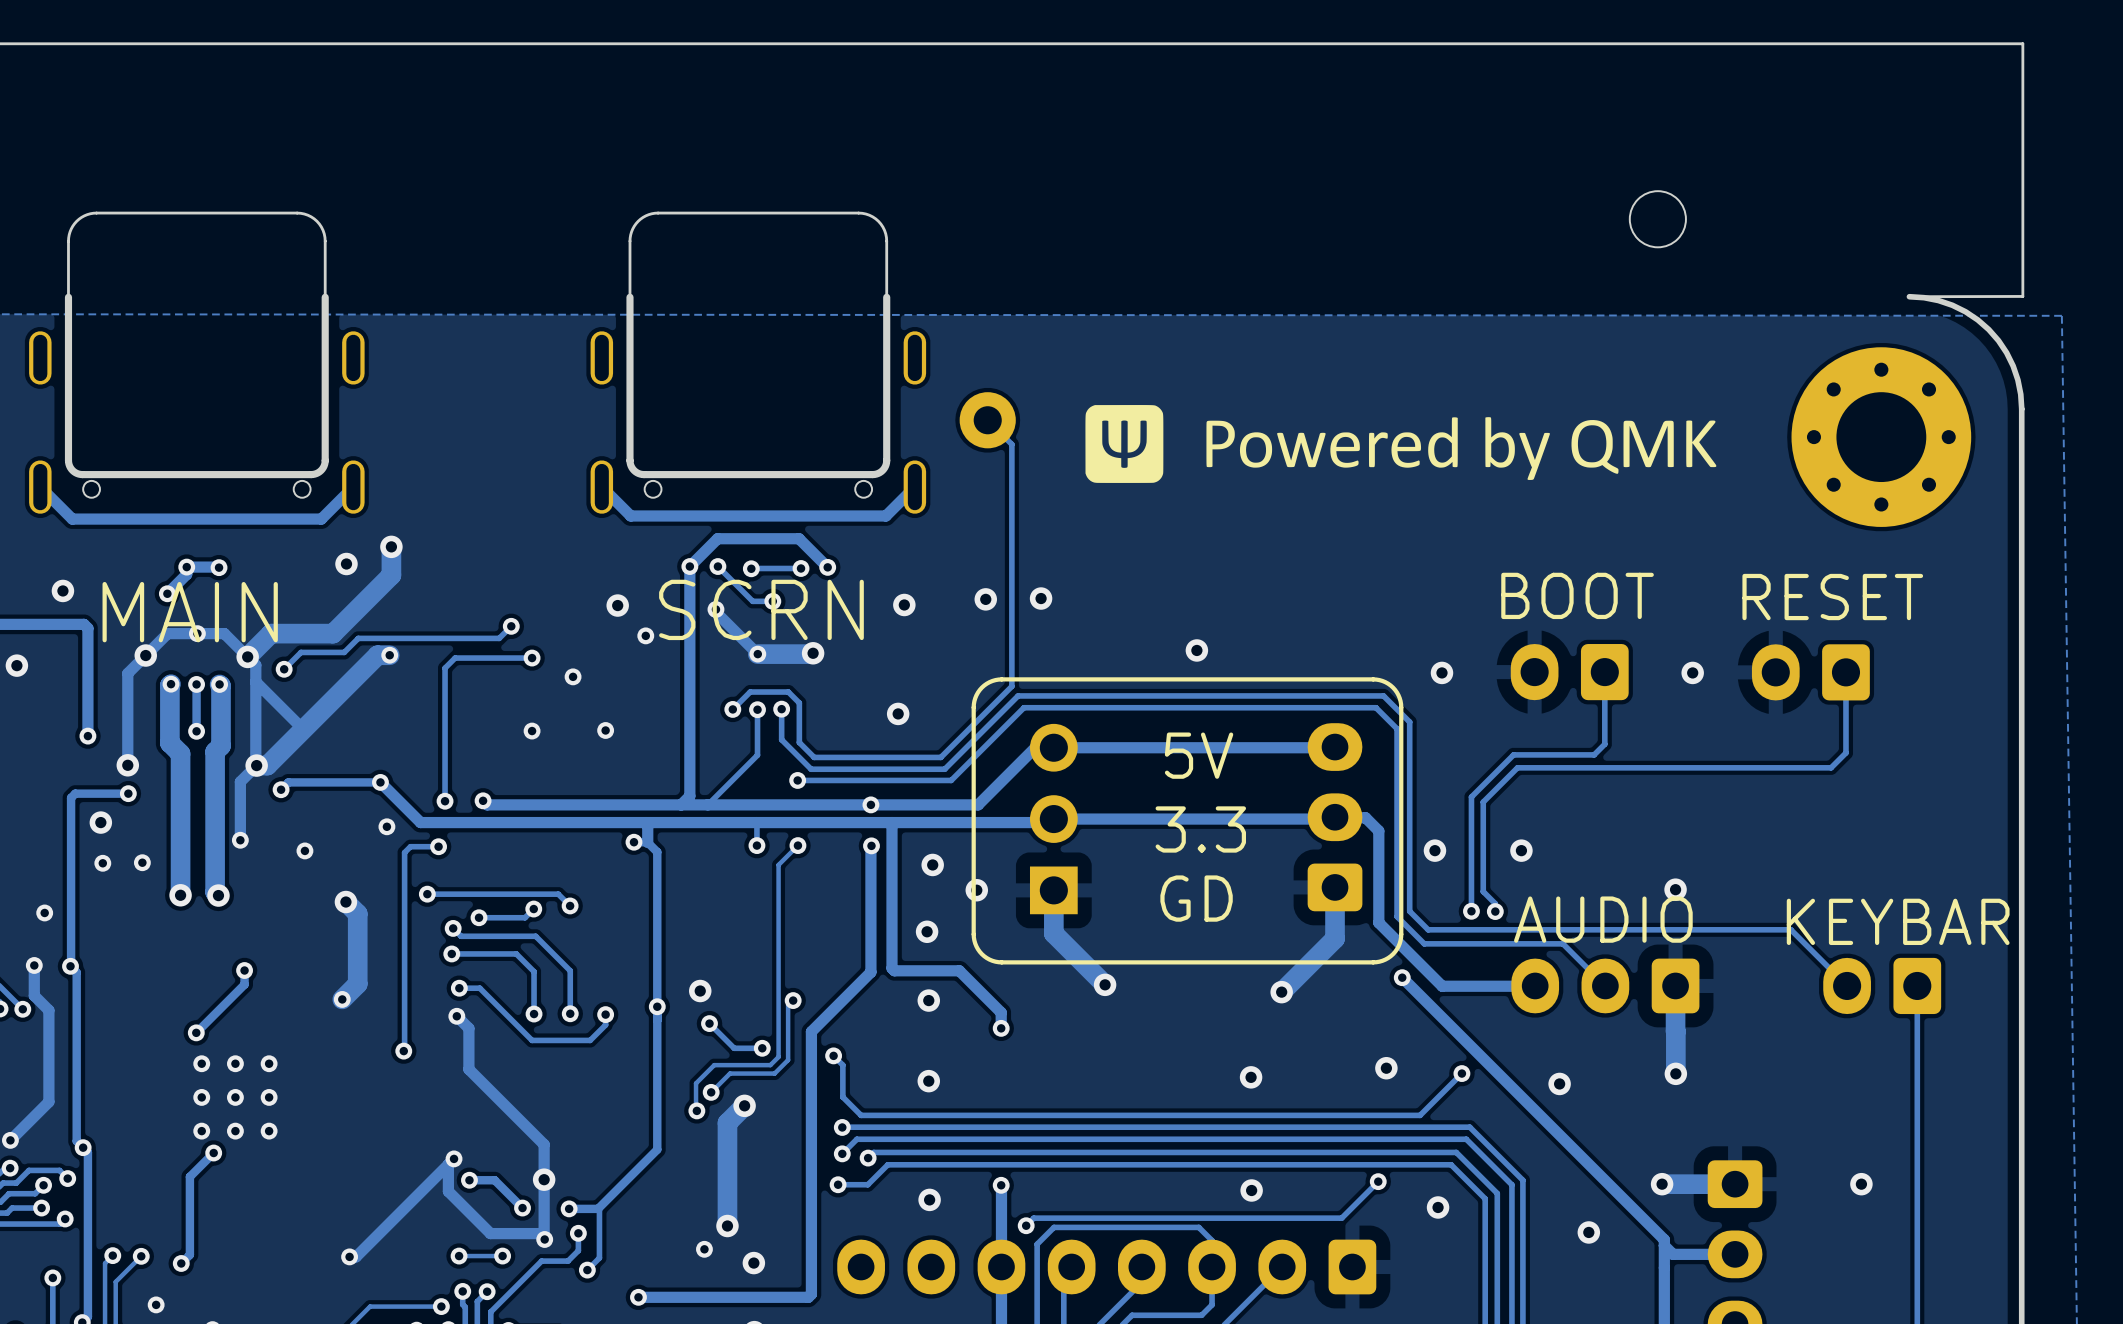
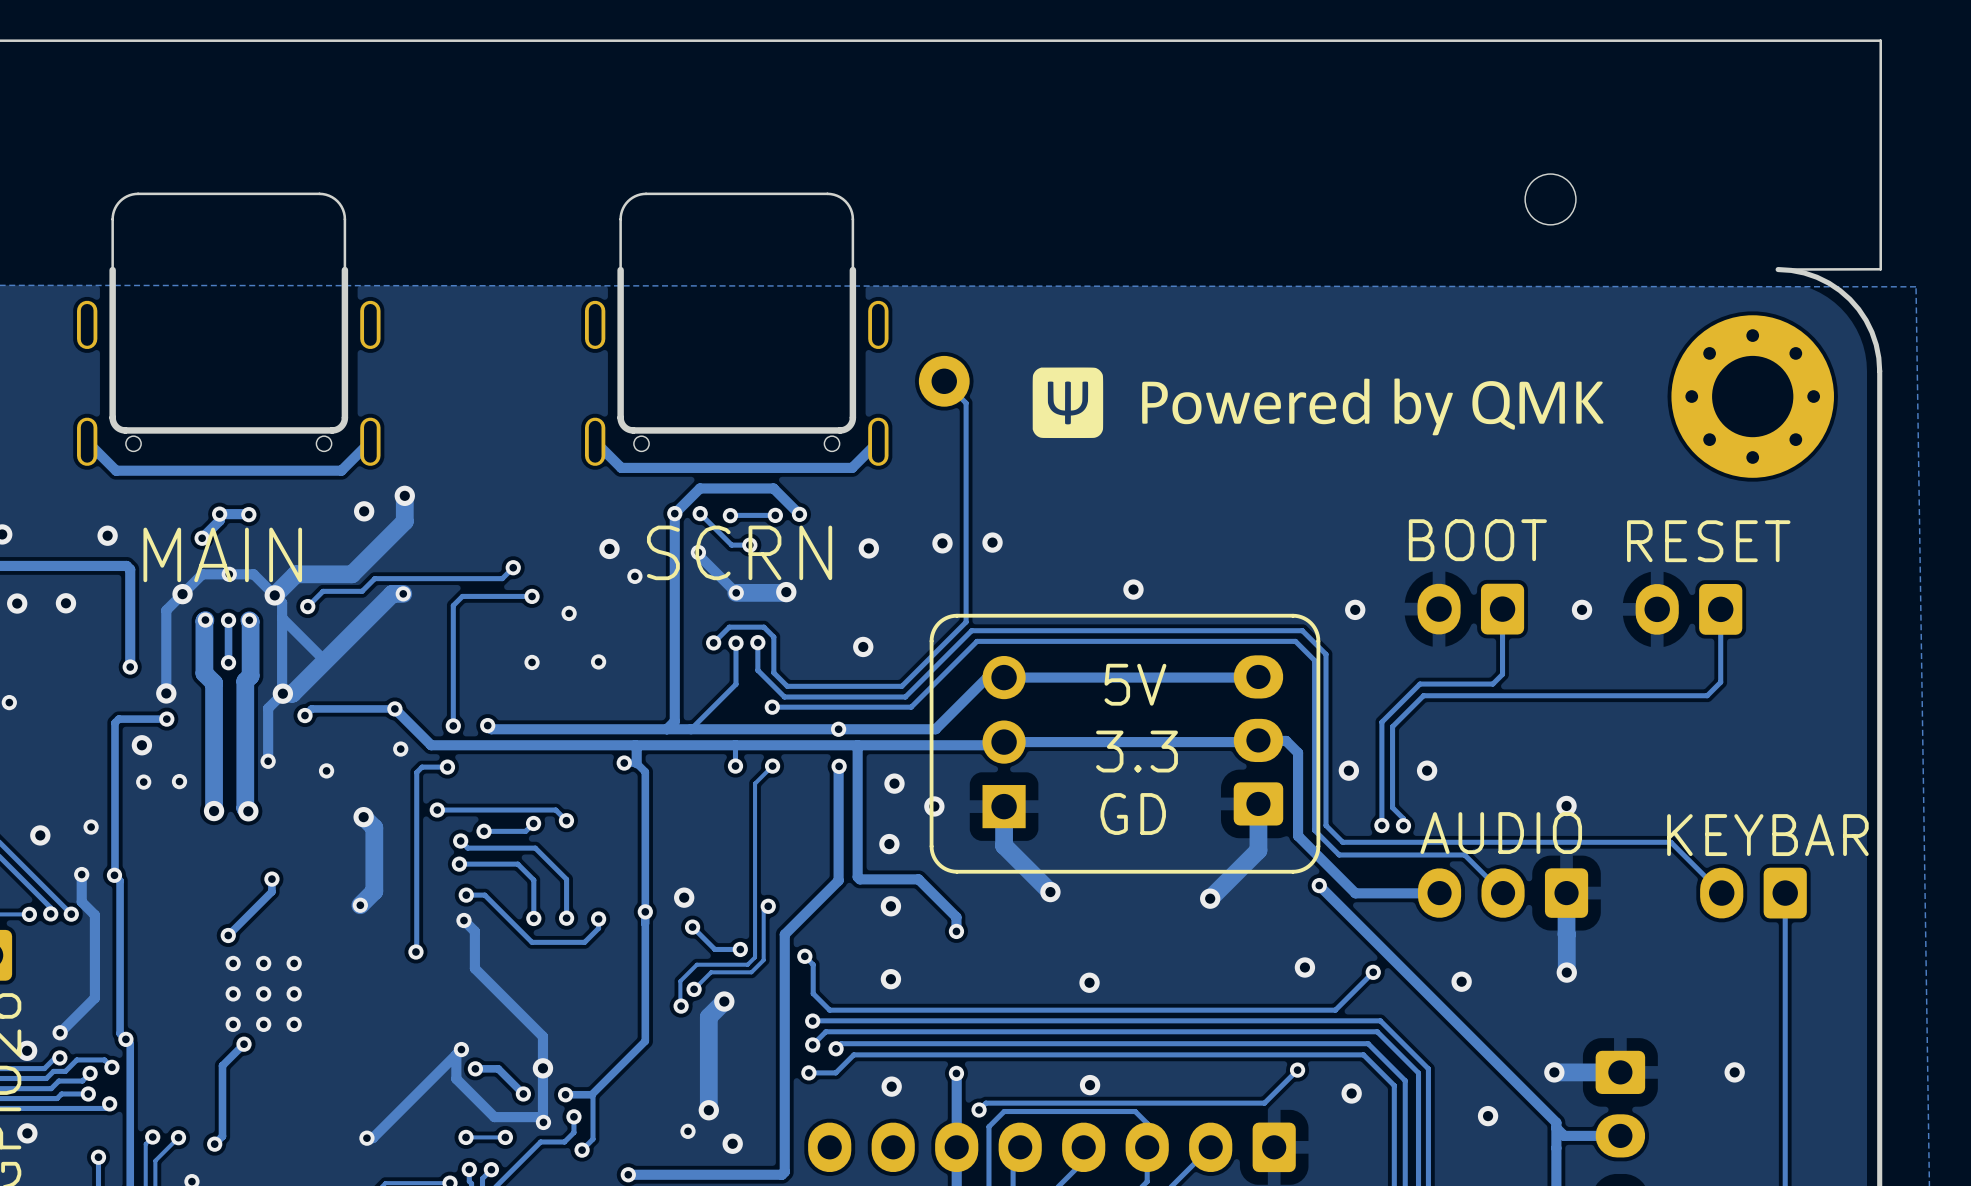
via: (1251, 1077) -> none
via: none -> (1089, 982)
via: (1251, 1190) -> none
via: none -> (1090, 1085)

